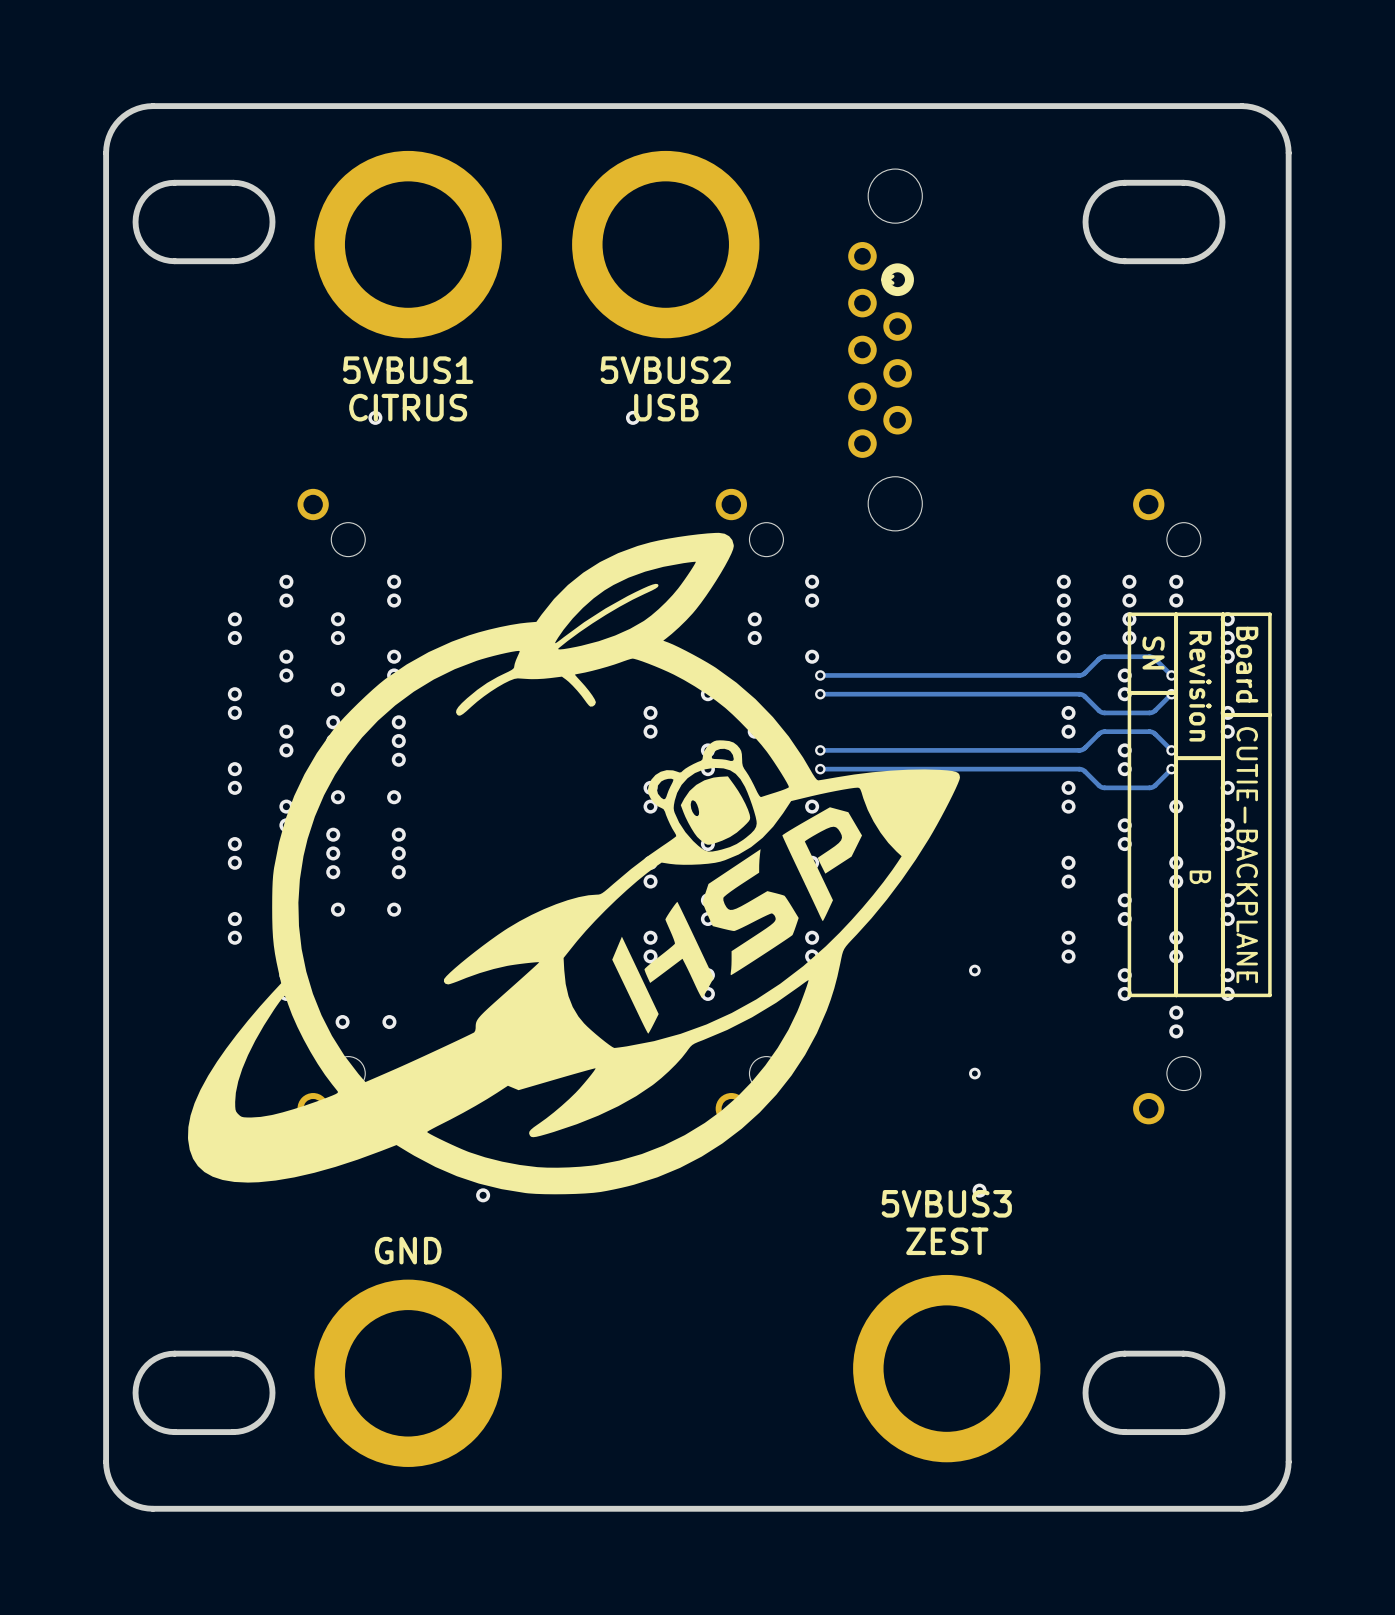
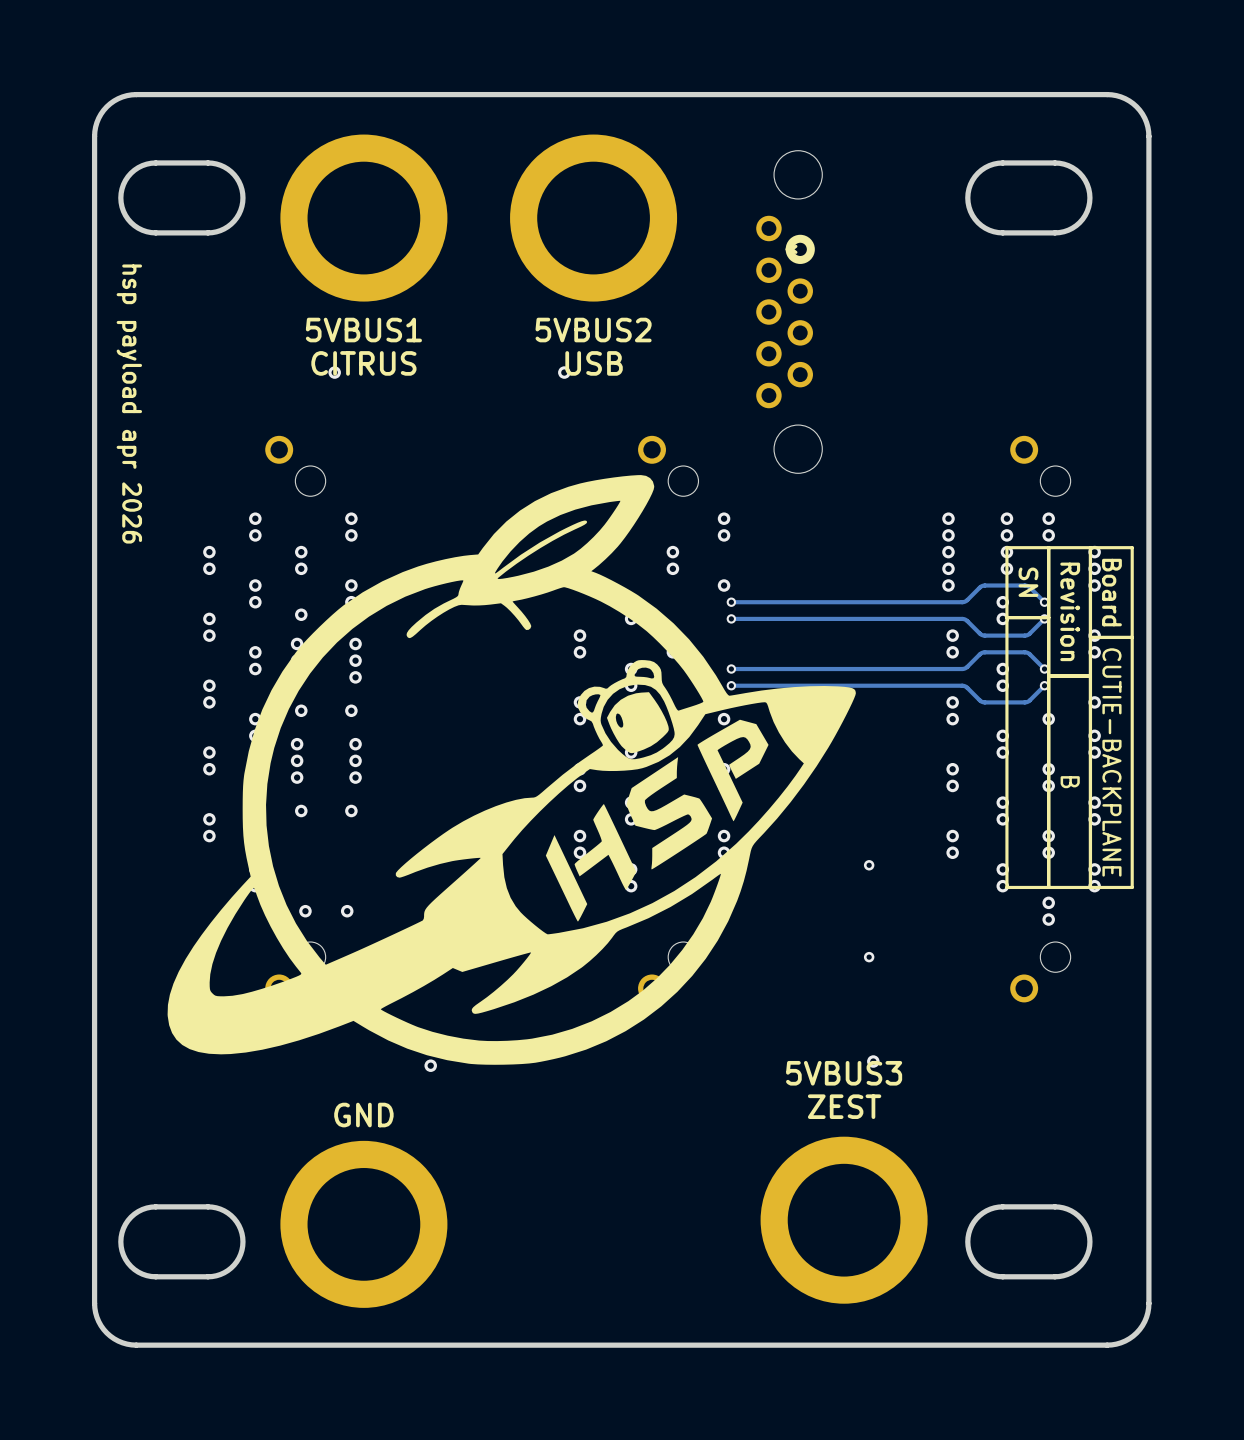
text: none -> hsp payload apr 2026 (129, 404)

